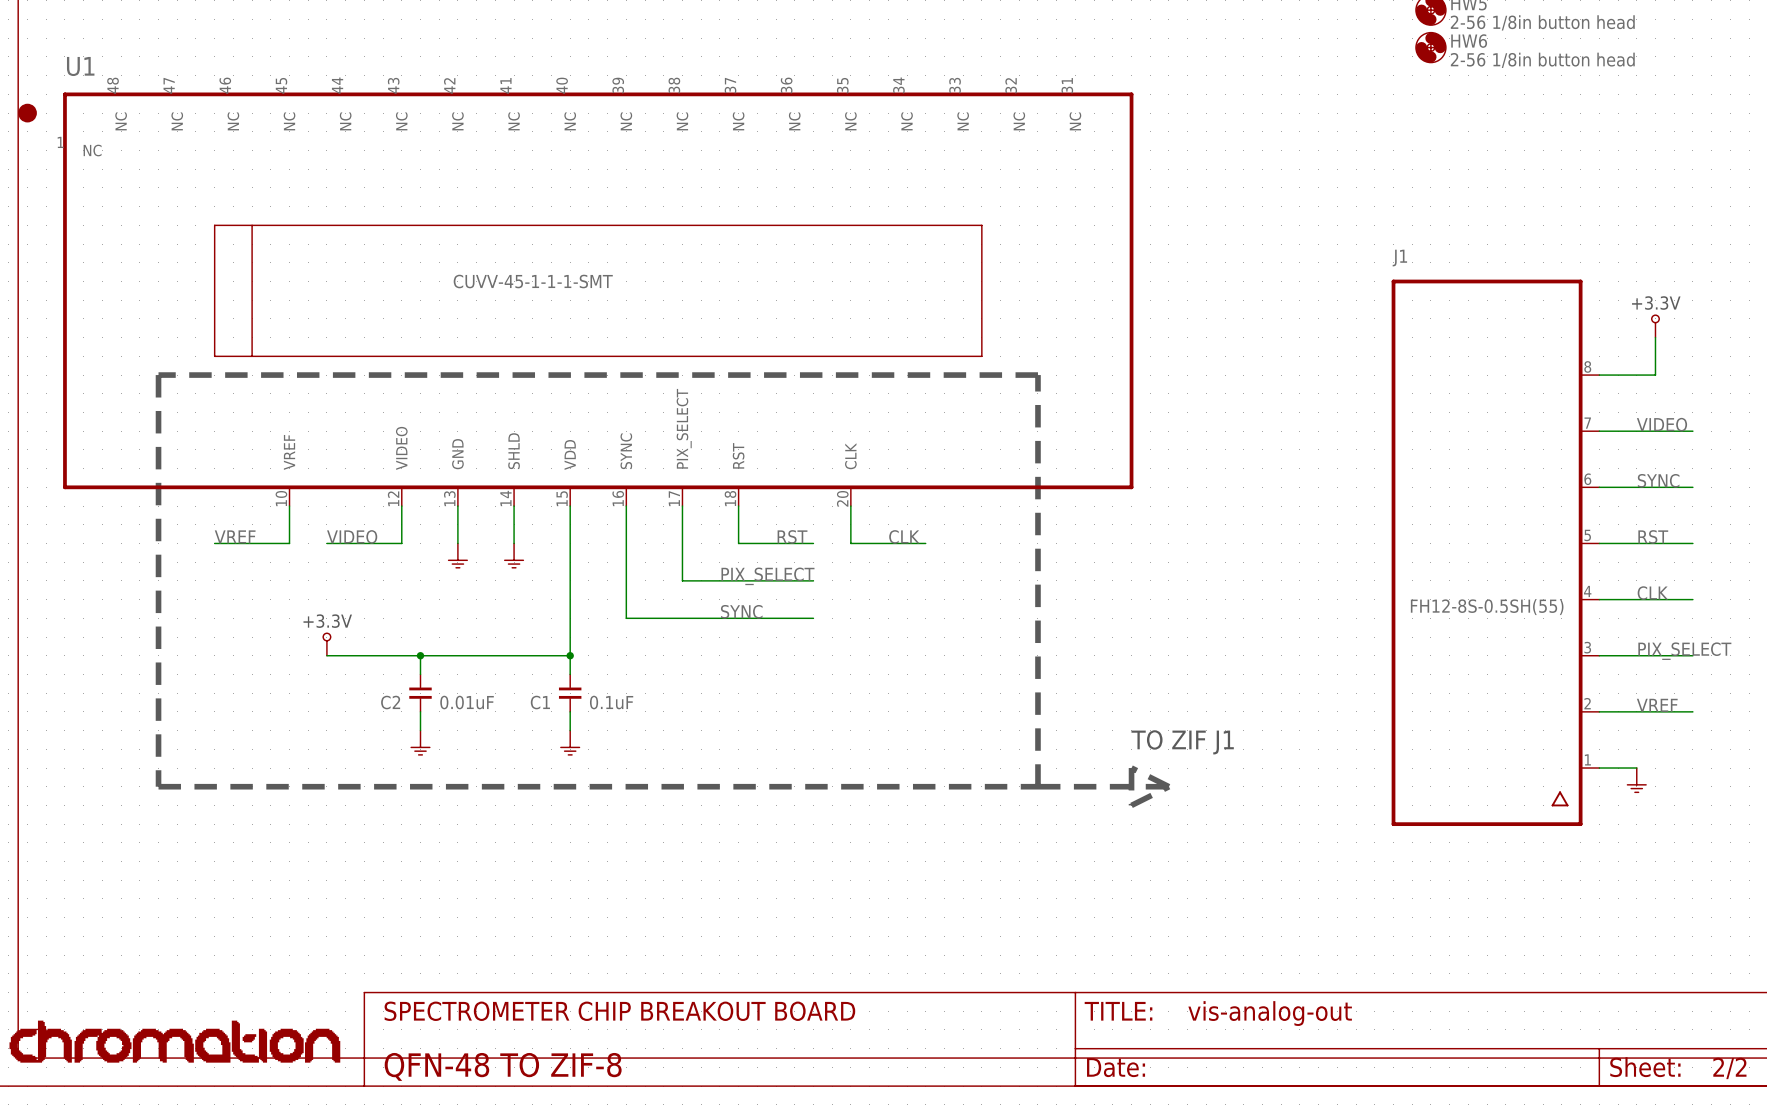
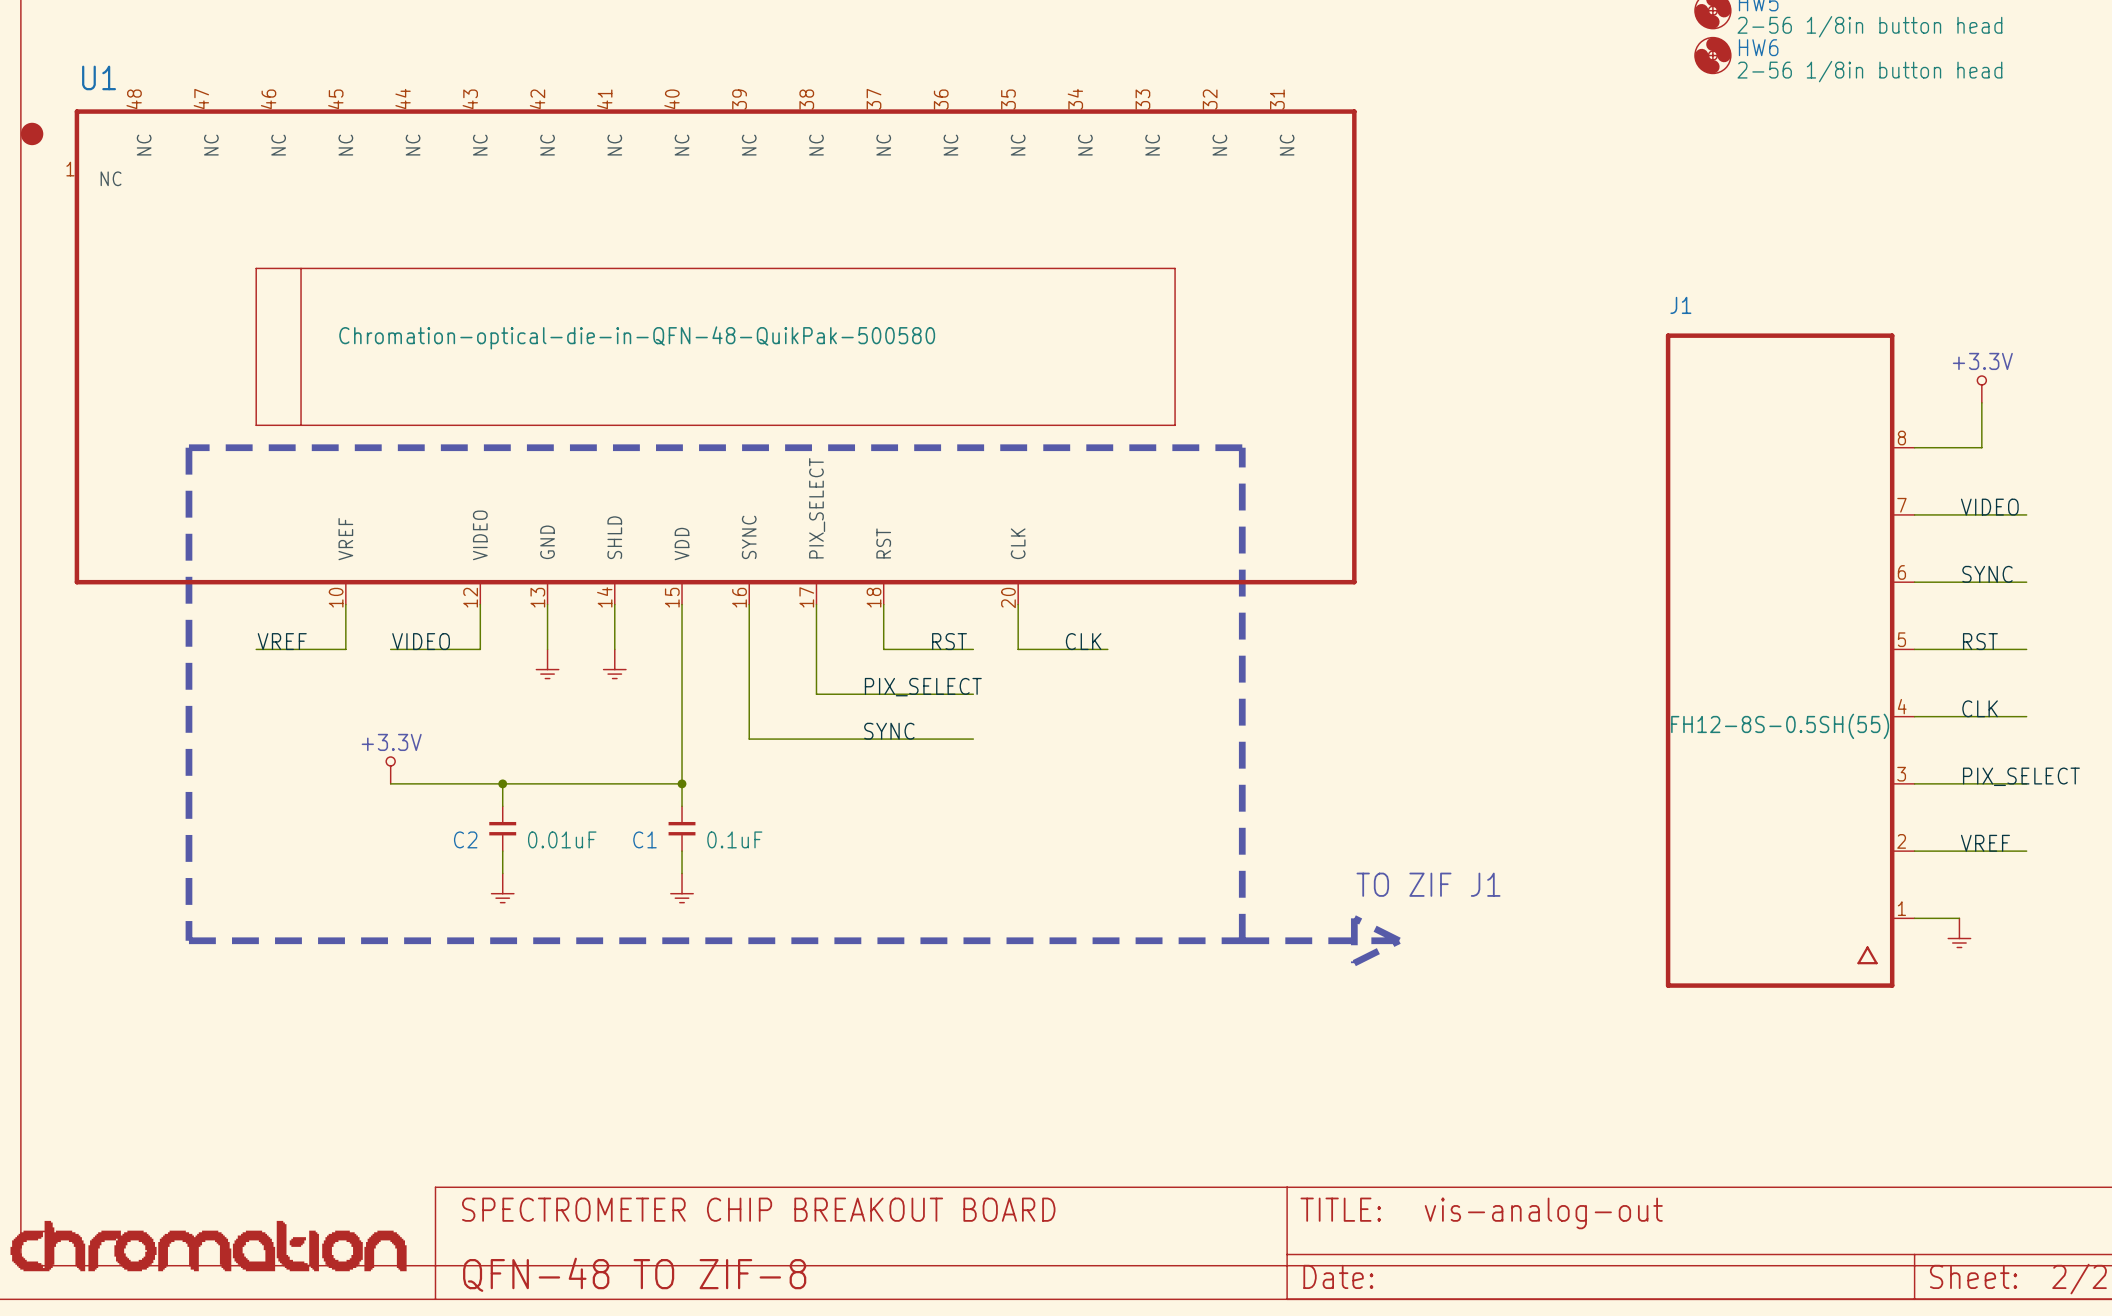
U1 value: CUVV-45-1-1-1-SMT (533, 281) -> Chromation-optical-die-in-QFN-48-QuikPak-500580 (637, 337)

